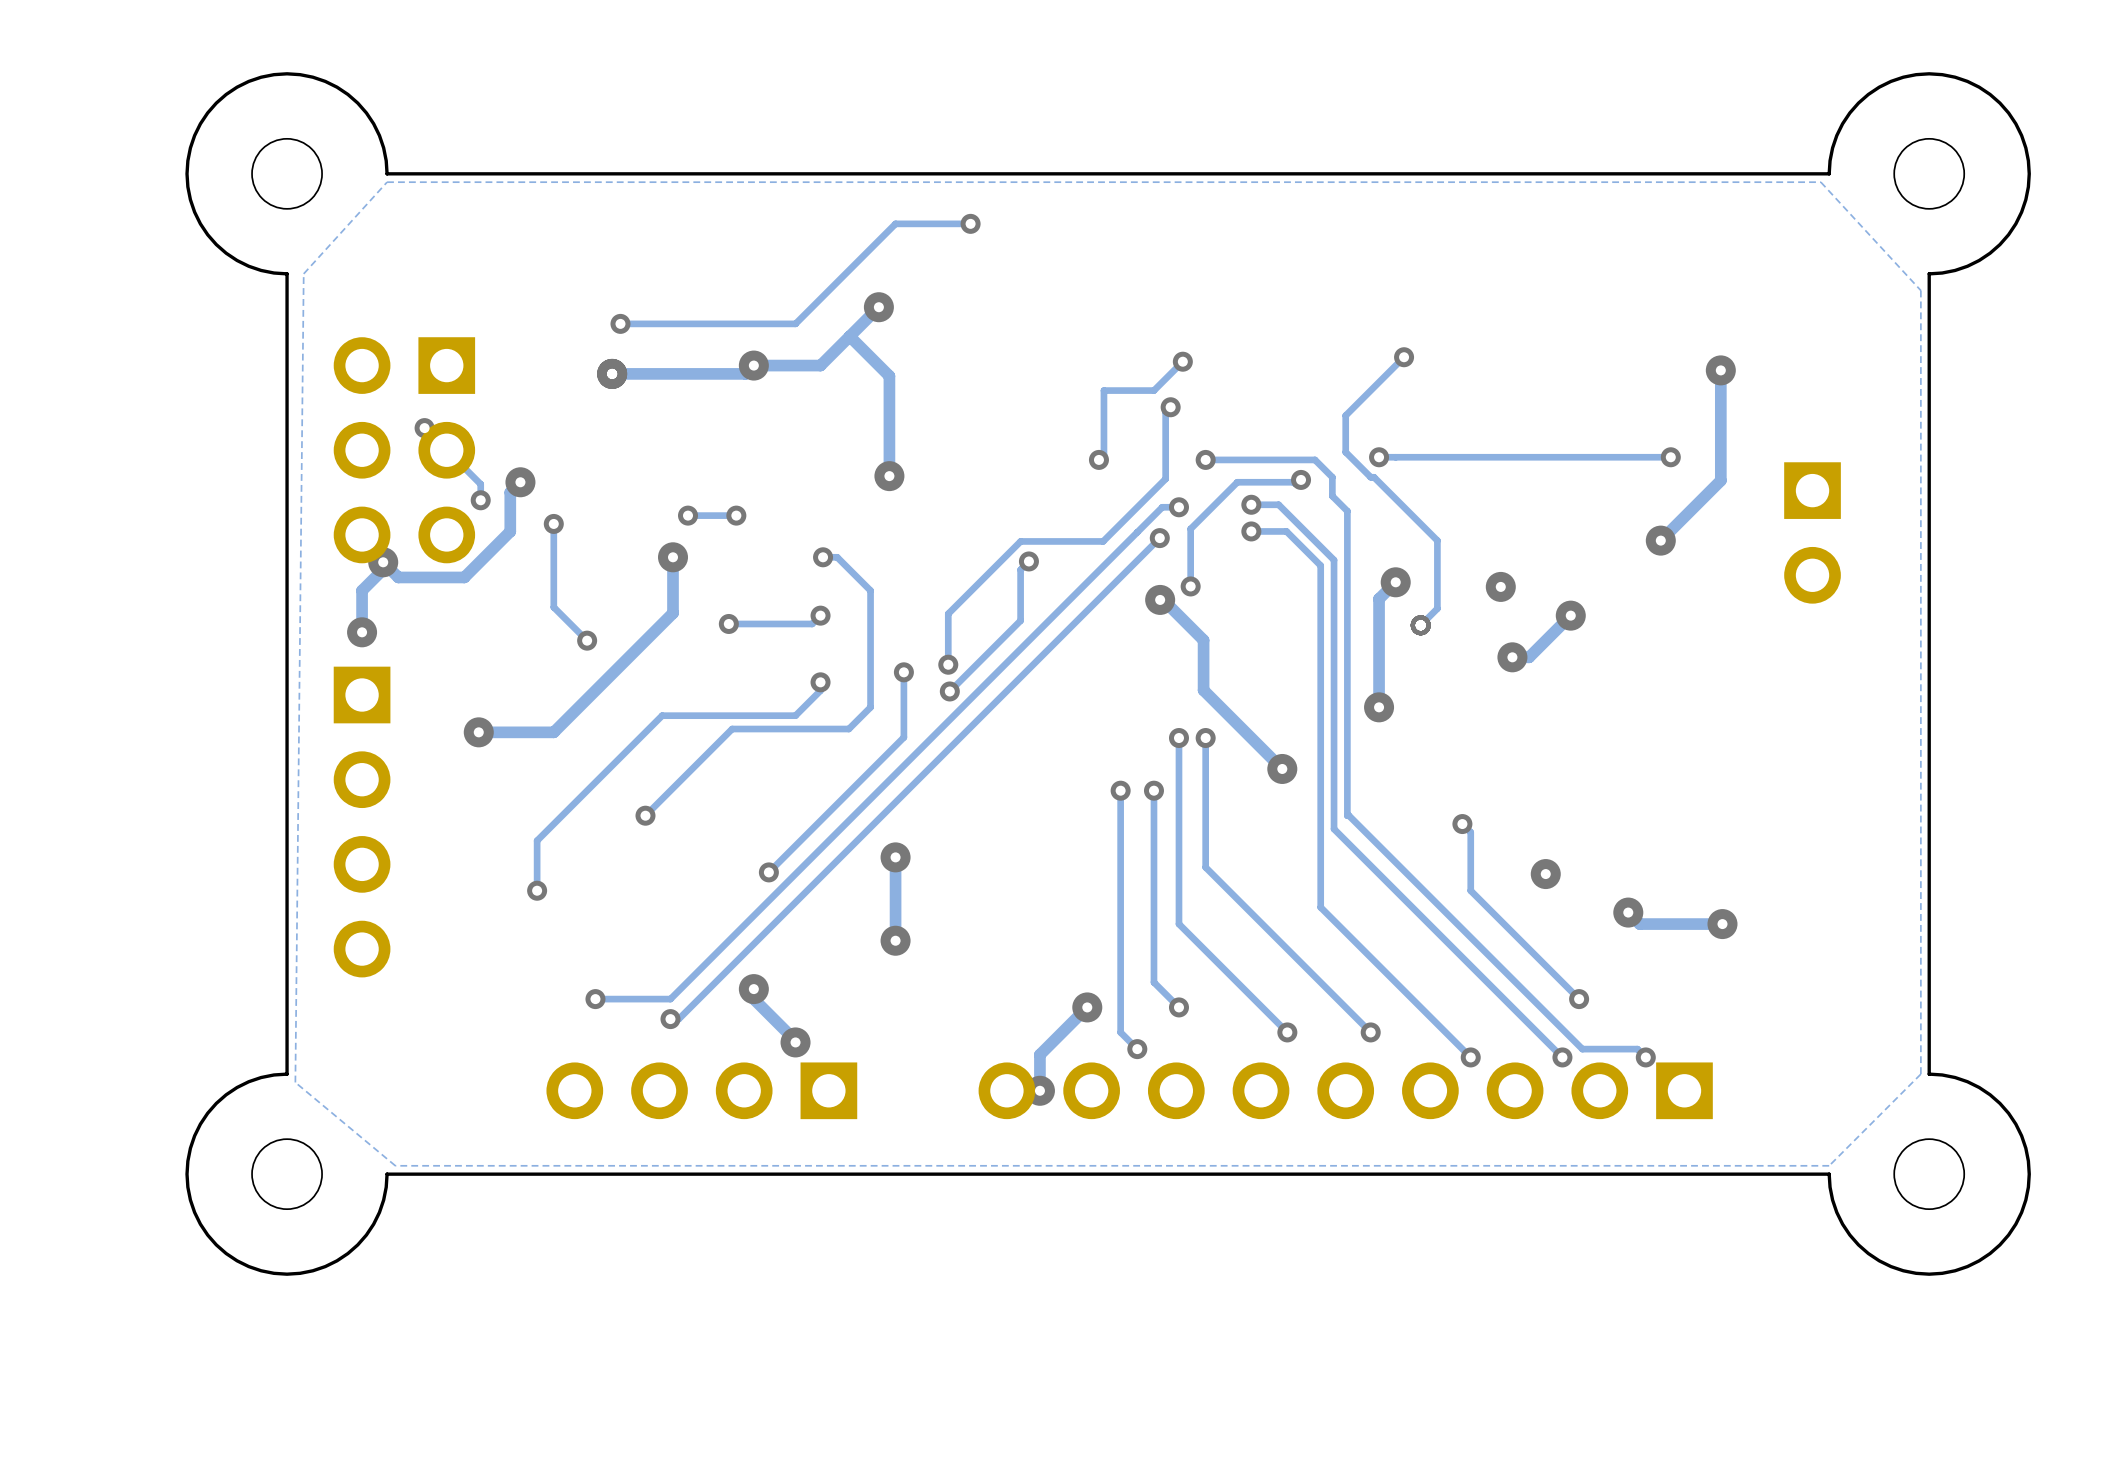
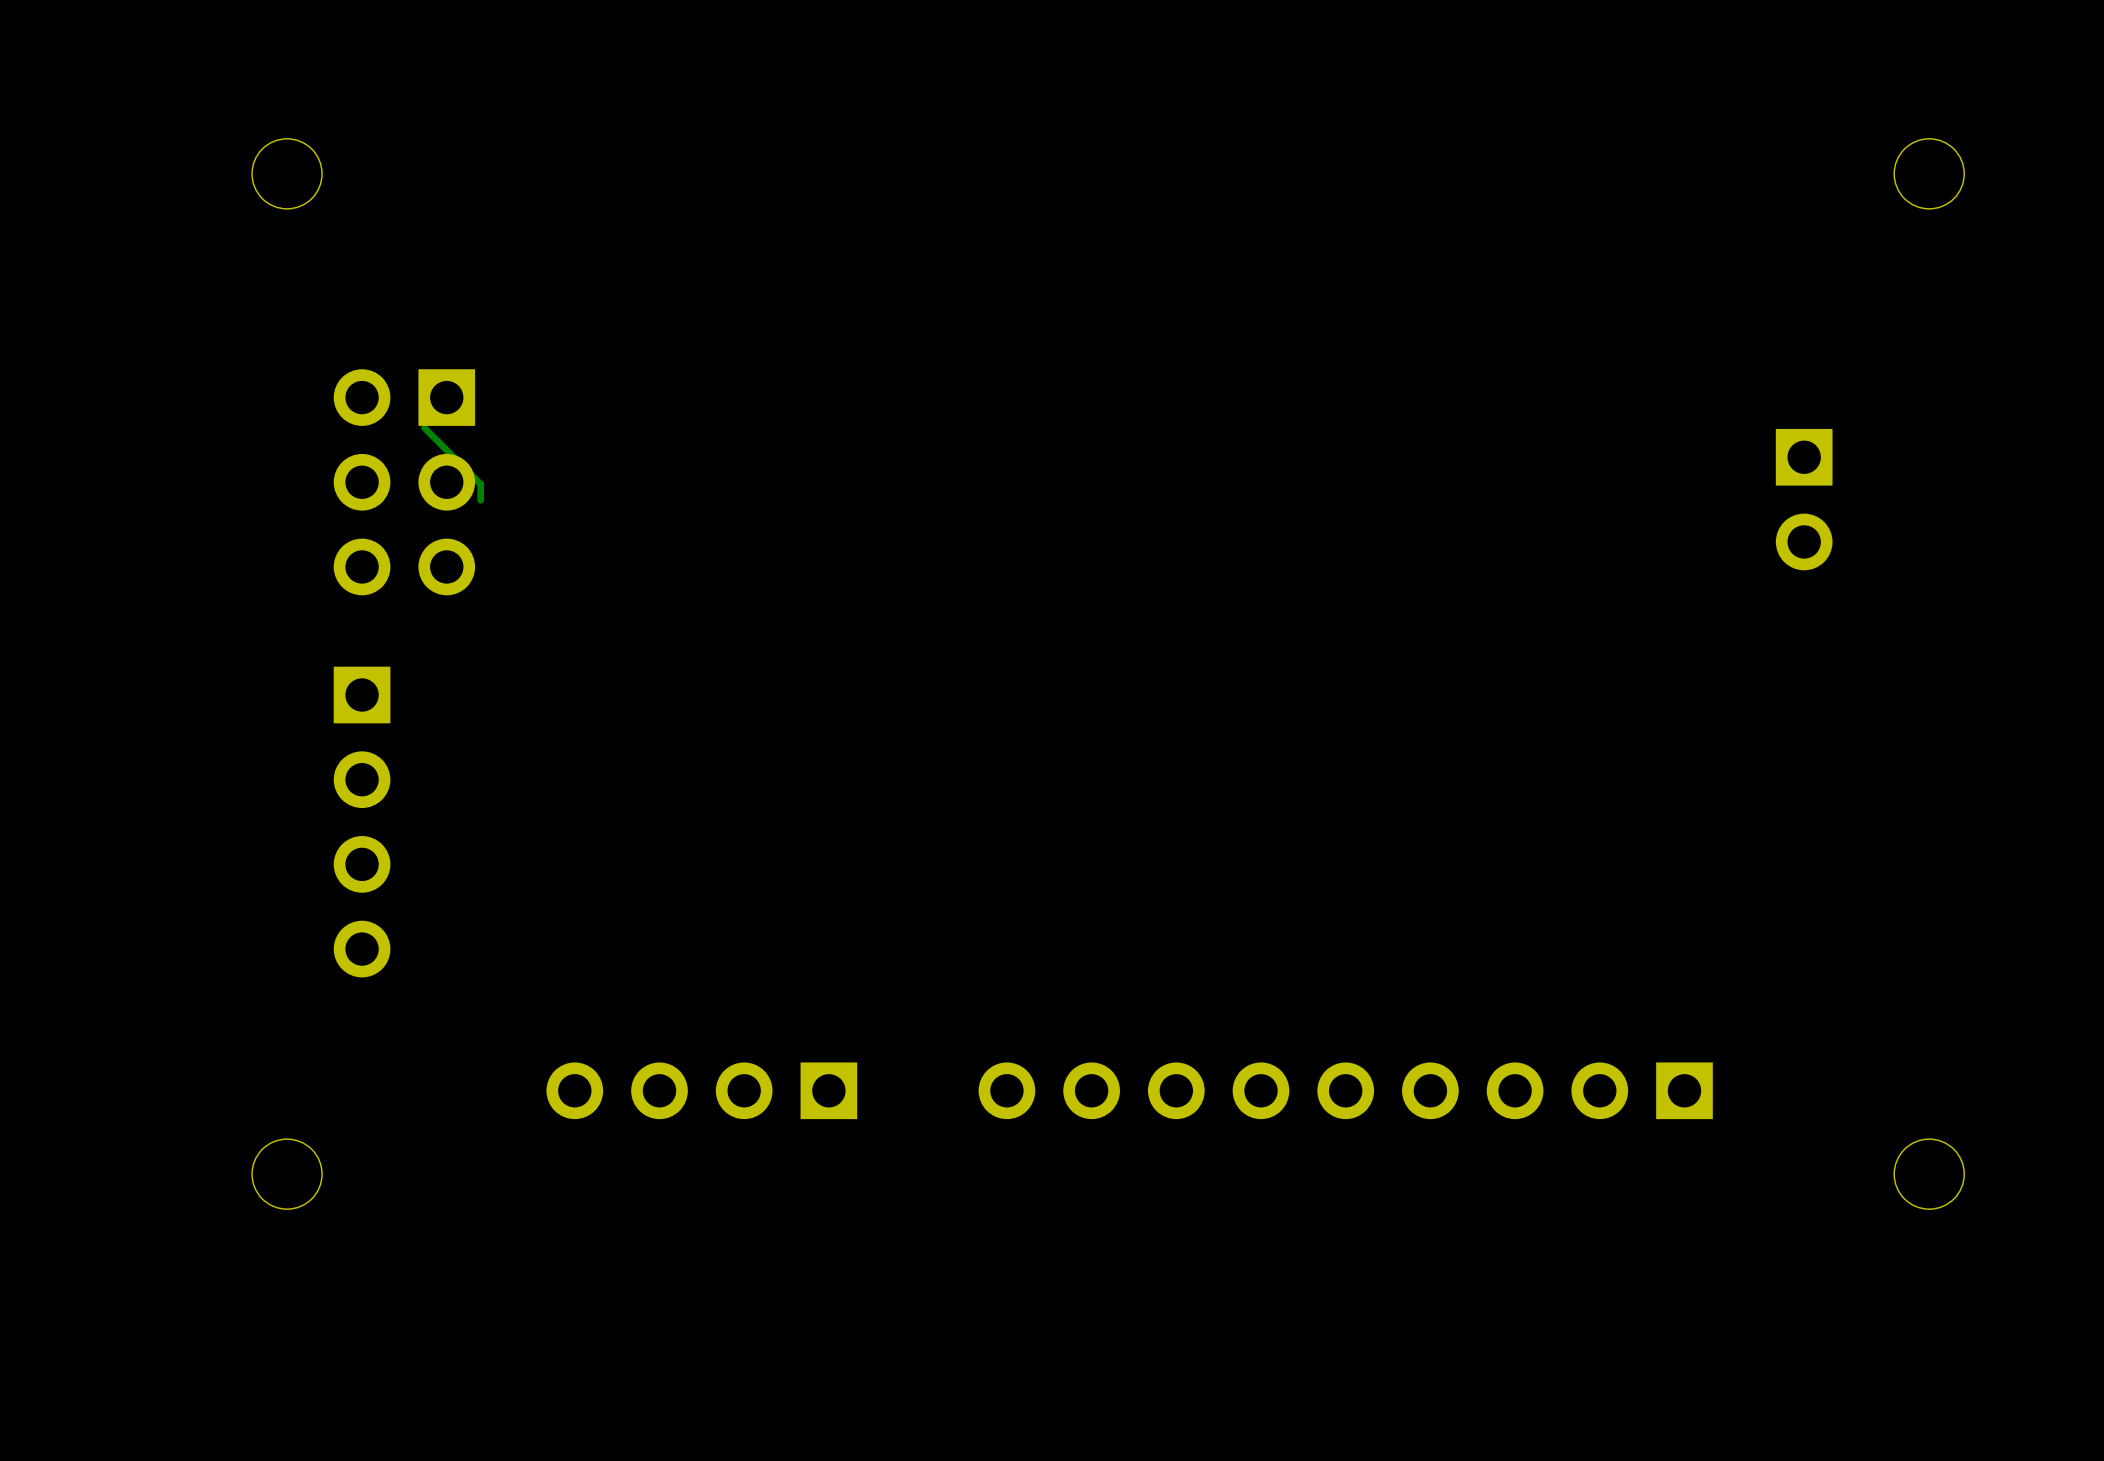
board edge: (1829, 173) (387, 173) (383, 147) (373, 123) (357, 103) (337, 87) (312, 77) (287, 73) (261, 77) (237, 87) (216, 103) (200, 123) (190, 147) (187, 173) (187, 186) (194, 212) (207, 234) (216, 244) (226, 253) (248, 266) (261, 270) (287, 273) (287, 1074) (261, 1077) (237, 1087) (216, 1103) (200, 1124) (190, 1148) (187, 1174) (190, 1200) (200, 1224) (216, 1244) (237, 1260) (261, 1270) (287, 1274) (312, 1270) (325, 1266) (337, 1260) (357, 1244) (366, 1235) (379, 1212) (386, 1187) (387, 1174) (1829, 1174) (1832, 1200) (1842, 1224) (1858, 1244) (1879, 1260) (1903, 1270) (1929, 1274) (1955, 1270) (1979, 1260) (1999, 1244) (2015, 1224) (2025, 1200) (2029, 1174) (2025, 1148) (2021, 1135) (2015, 1124) (1999, 1103) (1979, 1087) (1967, 1081) (1942, 1074) (1929, 1074) (1929, 273) (1942, 273) (1967, 266) (1990, 253) (2008, 234) (2021, 212) (2025, 199) (2029, 173) (2028, 160) (2021, 135) (2008, 112) (1999, 103) (1990, 94) (1967, 81) (1955, 77) (1929, 73) (1916, 74) (1890, 81) (1879, 87) (1858, 103) (1842, 123) (1836, 135) (1830, 160) (1829, 173) -> none
zone outline: (1820, 182) (387, 182) (303, 273) (295, 1082) (395, 1165) (1829, 1165) (1920, 1074) (1920, 290) (1820, 182) -> none
track: (970, 223) (895, 223) (795, 323) (620, 323) -> none
via: (970, 223) -> none
track: (878, 307) (820, 365) (753, 365) (745, 373) (612, 373) -> none
via: (878, 307) -> none
via: (620, 323) -> none
track: (849, 336) (889, 376) (889, 476) -> none
track: (1404, 357) (1345, 415) (1345, 452) (1370, 477) (1374, 477) (1437, 540) (1437, 608) (1420, 625) -> none
via: (1404, 357) -> none
track: (1182, 361) (1153, 390) (1103, 390) (1103, 454) (1098, 459) -> none
via: (1182, 361) -> none
via: (753, 365) -> none
track: (1720, 370) (1720, 480) (1660, 540) -> none
via: (1720, 370) -> none
via: (612, 373) -> none
track: (1170, 407) (1165, 412) (1165, 478) (1103, 541) (1020, 541) (948, 613) (948, 664) -> none
via: (1170, 407) -> none
via: (424, 428) -> none
part position: (404, 450) -> (404, 482)
via: (1379, 457) -> none
track: (1670, 457) (1379, 457) -> none
via: (1670, 457) -> none
via: (1098, 459) -> none
track: (1205, 459) (1315, 459) (1332, 477) (1332, 496) (1347, 511) (1347, 815) (1582, 1049) (1637, 1049) (1645, 1057) -> none
via: (1205, 459) -> none
via: (889, 476) -> none
track: (1301, 479) (1294, 483) (1237, 482) (1190, 528) (1190, 586) -> none
via: (1301, 479) -> none
track: (520, 482) (510, 492) (510, 531) (464, 577) (398, 577) (383, 562) -> none
via: (520, 482) -> none
via: (480, 500) -> none
track: (1251, 504) (1278, 504) (1334, 560) (1334, 829) (1562, 1057) -> none
via: (1251, 504) -> none
track: (1178, 507) (1162, 507) (670, 999) (595, 999) -> none
via: (1178, 507) -> none
via: (688, 515) -> none
track: (736, 515) (688, 515) -> none
via: (736, 515) -> none
track: (553, 523) (553, 607) (587, 640) -> none
via: (553, 523) -> none
track: (1251, 531) (1286, 531) (1320, 565) (1320, 907) (1470, 1057) -> none
via: (1251, 531) -> none
part position: (1812, 532) -> (1804, 499)
track: (1159, 538) (678, 1019) (670, 1019) -> none
via: (1159, 538) -> none
via: (1660, 540) -> none
track: (673, 557) (673, 613) (553, 732) (478, 732) -> none
via: (673, 557) -> none
track: (823, 557) (837, 557) (870, 590) (870, 707) (848, 729) (732, 729) (645, 815) -> none
via: (823, 557) -> none
track: (1028, 561) (1020, 569) (1020, 620) (949, 691) -> none
via: (1028, 561) -> none
via: (383, 562) -> none
track: (387, 565) (362, 590) (362, 632) -> none
track: (1395, 582) (1379, 598) (1379, 707) -> none
via: (1395, 582) -> none
via: (1190, 586) -> none
via: (1500, 586) -> none
track: (1160, 599) (1162, 598) (1203, 640) (1203, 690) (1282, 768) -> none
via: (1160, 599) -> none
track: (820, 615) (812, 623) (728, 623) -> none
via: (820, 615) -> none
track: (1570, 615) (1529, 657) (1512, 657) -> none
via: (1570, 615) -> none
via: (728, 623) -> none
via: (1420, 625) -> none
via: (362, 632) -> none
via: (587, 640) -> none
via: (1512, 657) -> none
via: (948, 664) -> none
track: (903, 672) (903, 737) (768, 872) -> none
via: (903, 672) -> none
track: (820, 682) (820, 690) (795, 715) (662, 715) (537, 840) (537, 890) -> none
via: (820, 682) -> none
via: (949, 691) -> none
via: (1379, 707) -> none
via: (478, 732) -> none
track: (1178, 738) (1178, 924) (1287, 1032) -> none
via: (1178, 738) -> none
track: (1205, 738) (1205, 867) (1370, 1032) -> none
via: (1205, 738) -> none
via: (1282, 768) -> none
track: (1120, 790) (1120, 1032) (1137, 1049) -> none
via: (1120, 790) -> none
track: (1153, 790) (1153, 982) (1178, 1007) -> none
via: (1153, 790) -> none
via: (645, 815) -> none
track: (1462, 824) (1470, 832) (1470, 890) (1579, 999) -> none
via: (1462, 824) -> none
track: (895, 857) (895, 940) -> none
via: (895, 857) -> none
via: (768, 872) -> none
via: (1545, 874) -> none
via: (537, 890) -> none
track: (1628, 912) (1639, 924) (1722, 924) -> none
via: (1628, 912) -> none
via: (1722, 924) -> none
via: (895, 940) -> none
track: (753, 989) (753, 999) (795, 1042) -> none
via: (753, 989) -> none
via: (595, 999) -> none
via: (1579, 999) -> none
track: (1087, 1007) (1039, 1054) (1039, 1090) -> none
via: (1087, 1007) -> none
via: (1178, 1007) -> none
via: (670, 1019) -> none
via: (1287, 1032) -> none
via: (1370, 1032) -> none
via: (795, 1042) -> none
via: (1137, 1049) -> none
via: (1470, 1057) -> none
via: (1562, 1057) -> none
via: (1645, 1057) -> none
via: (1039, 1090) -> none

